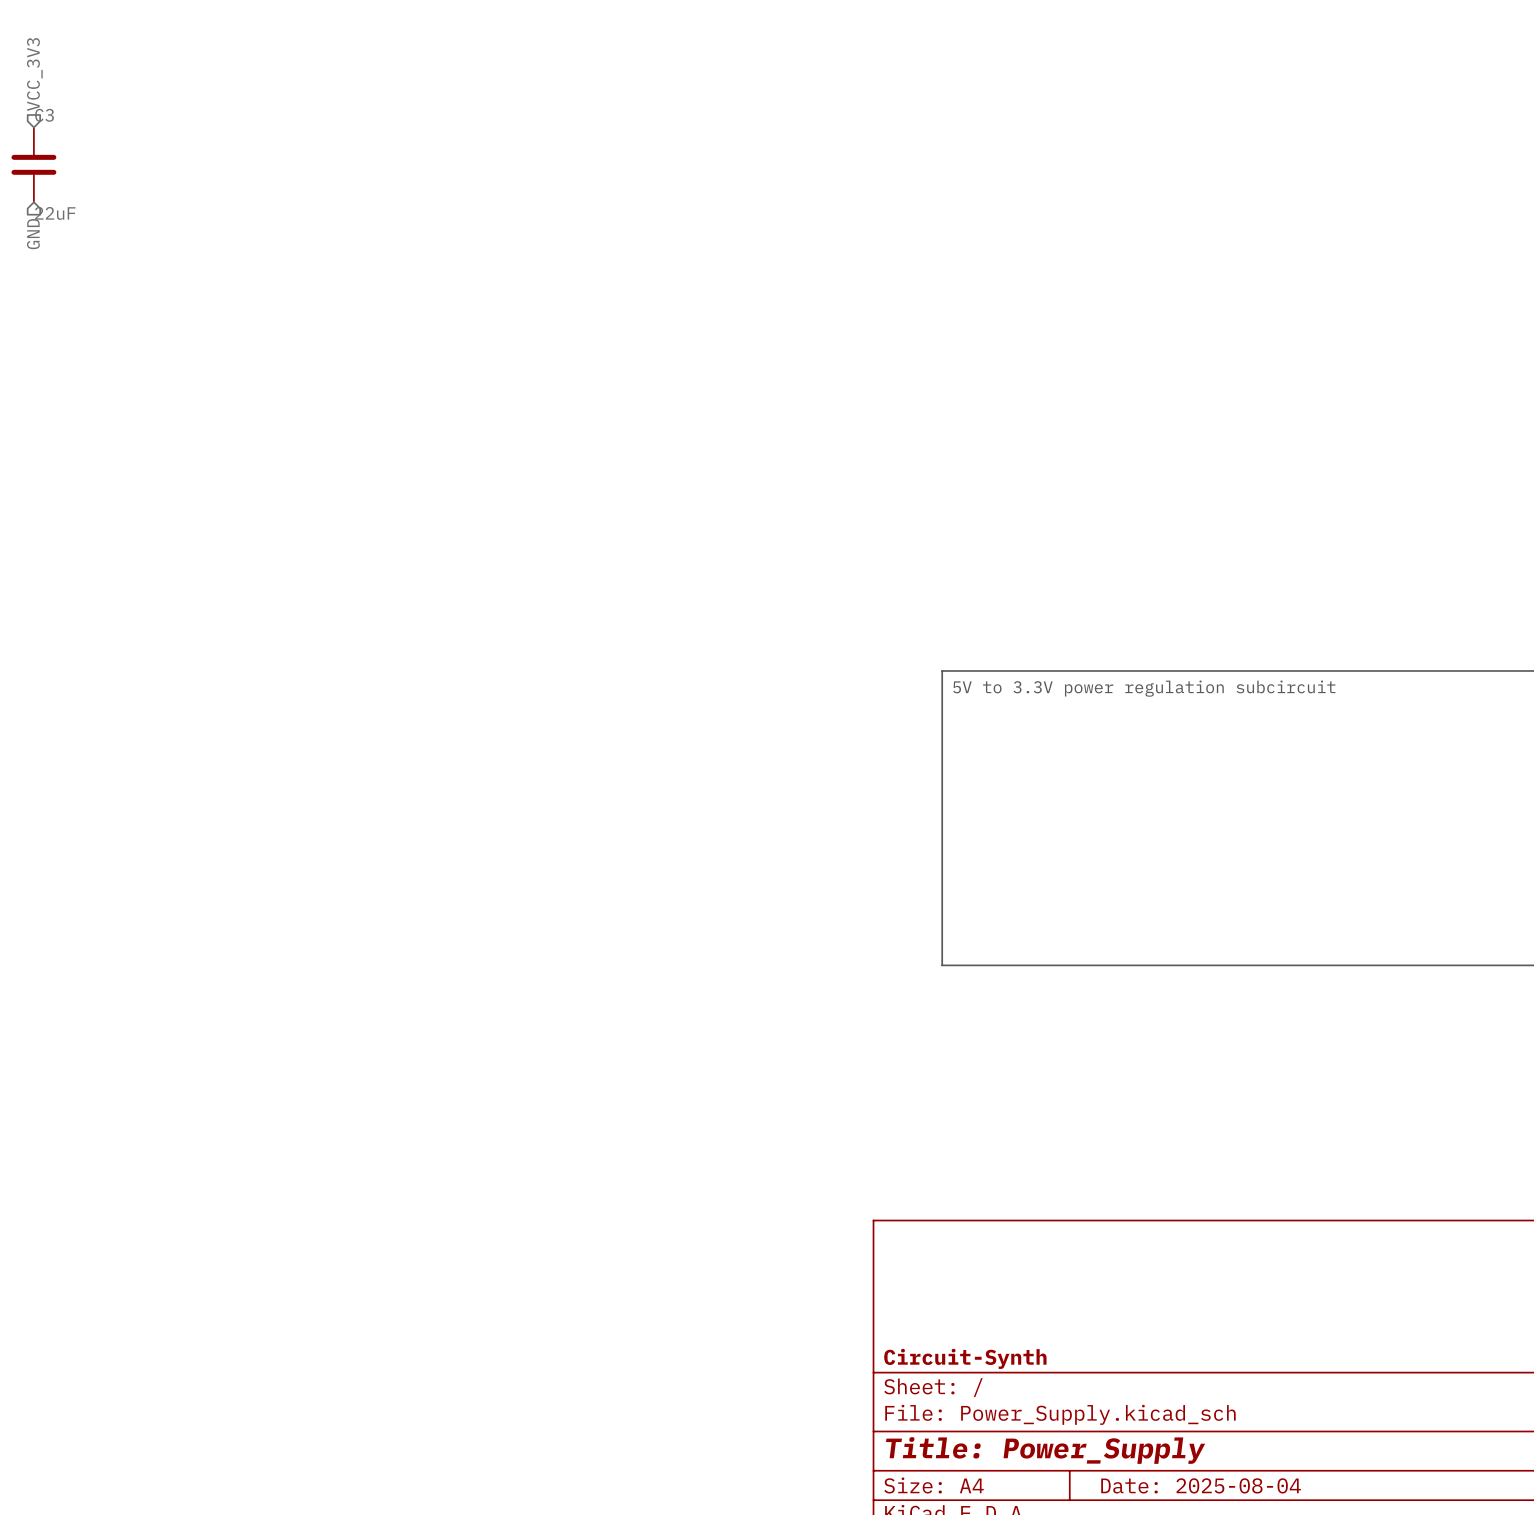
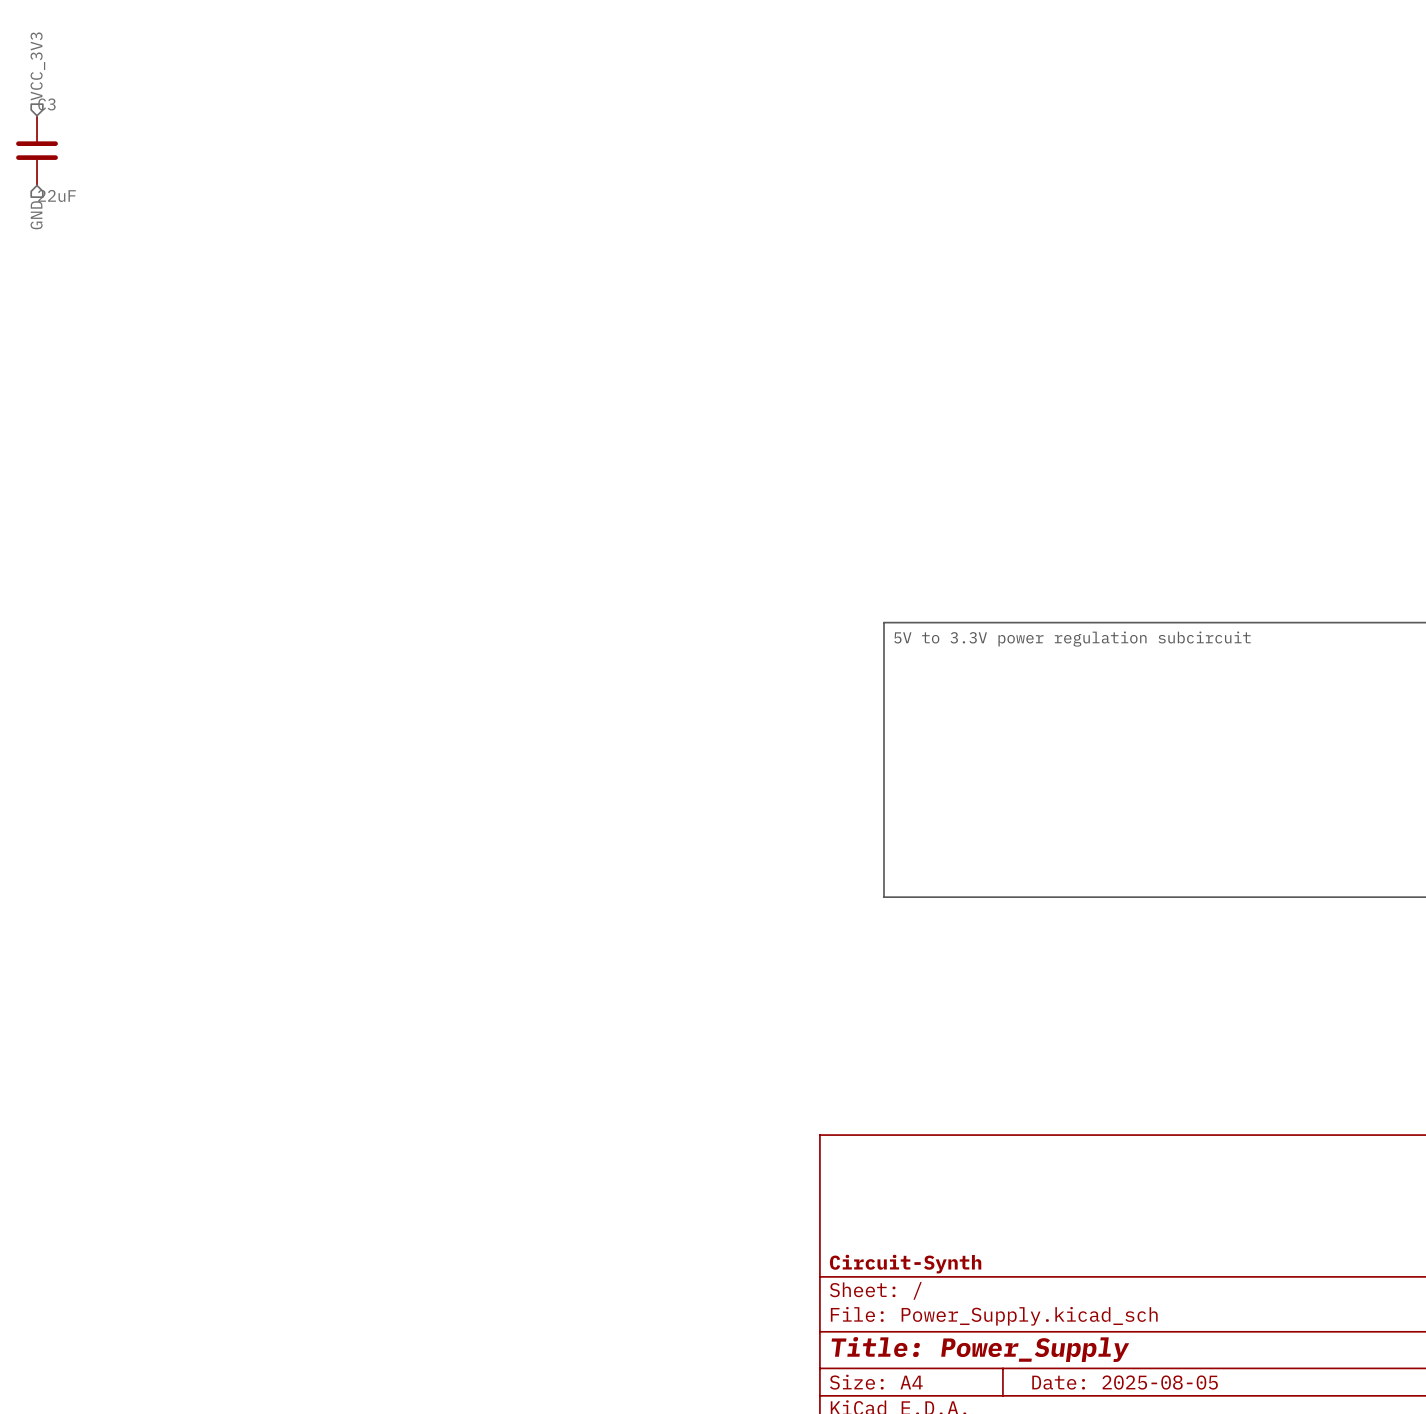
title block: Date: 2025-08-04 (1201, 1485) -> Date: 2025-08-05 (1125, 1382)

